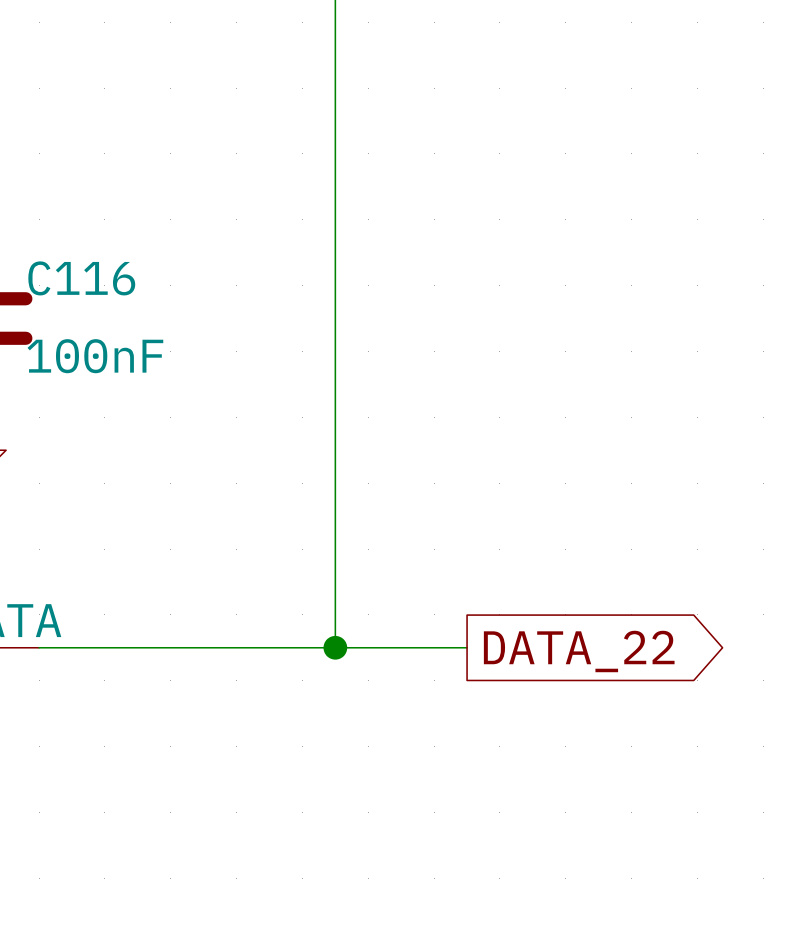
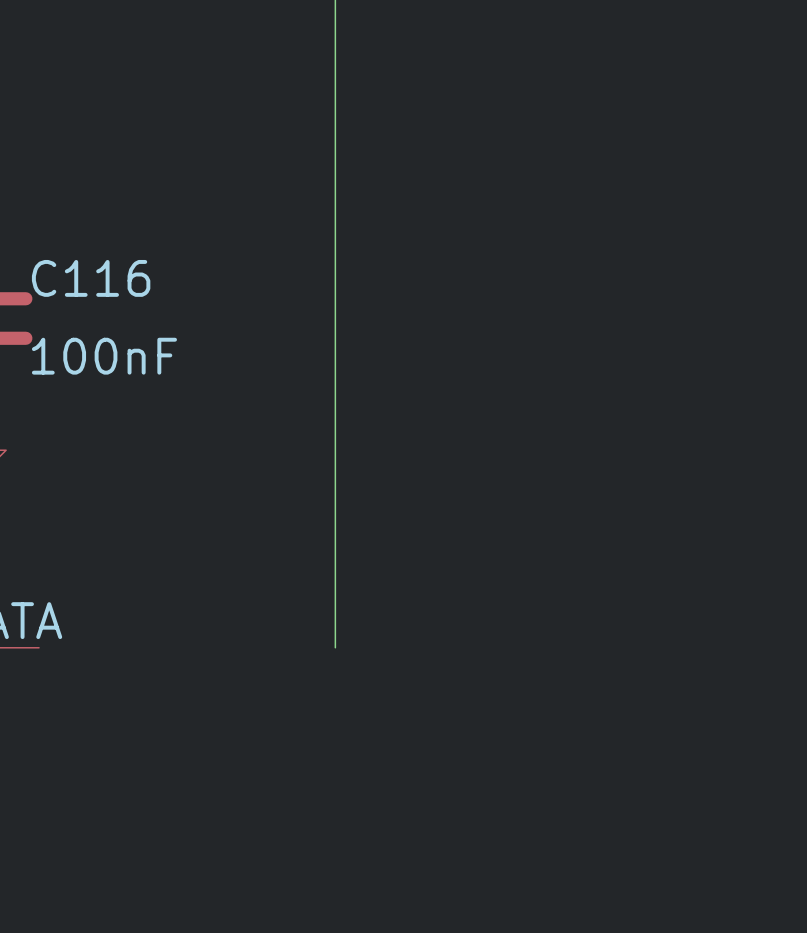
wire: (39, 647) (467, 647) -> none
junction: (335, 647) -> none
global label: DATA_22 (579, 651) -> none

